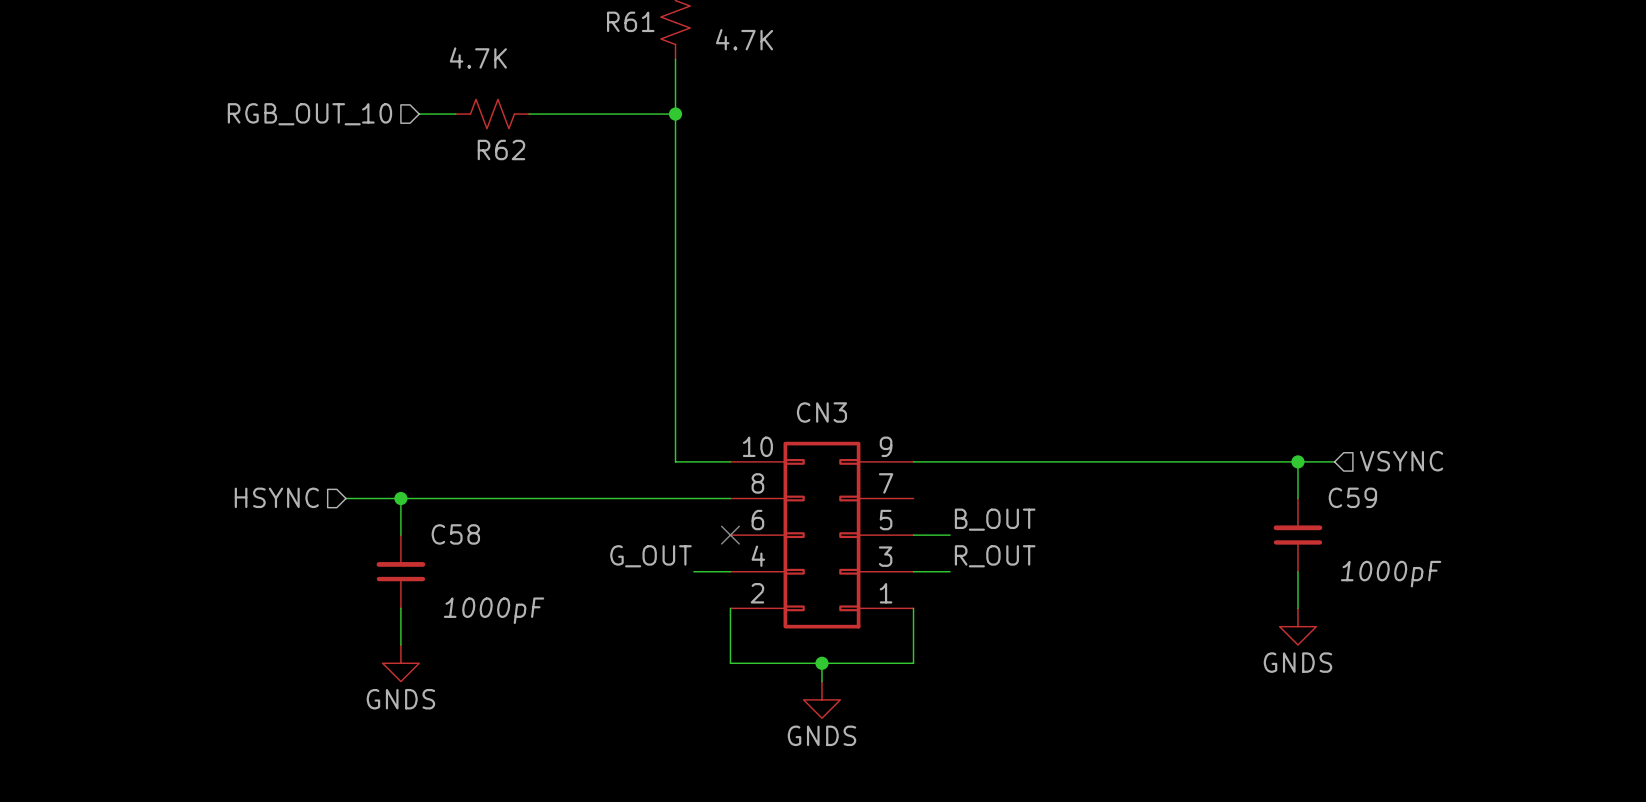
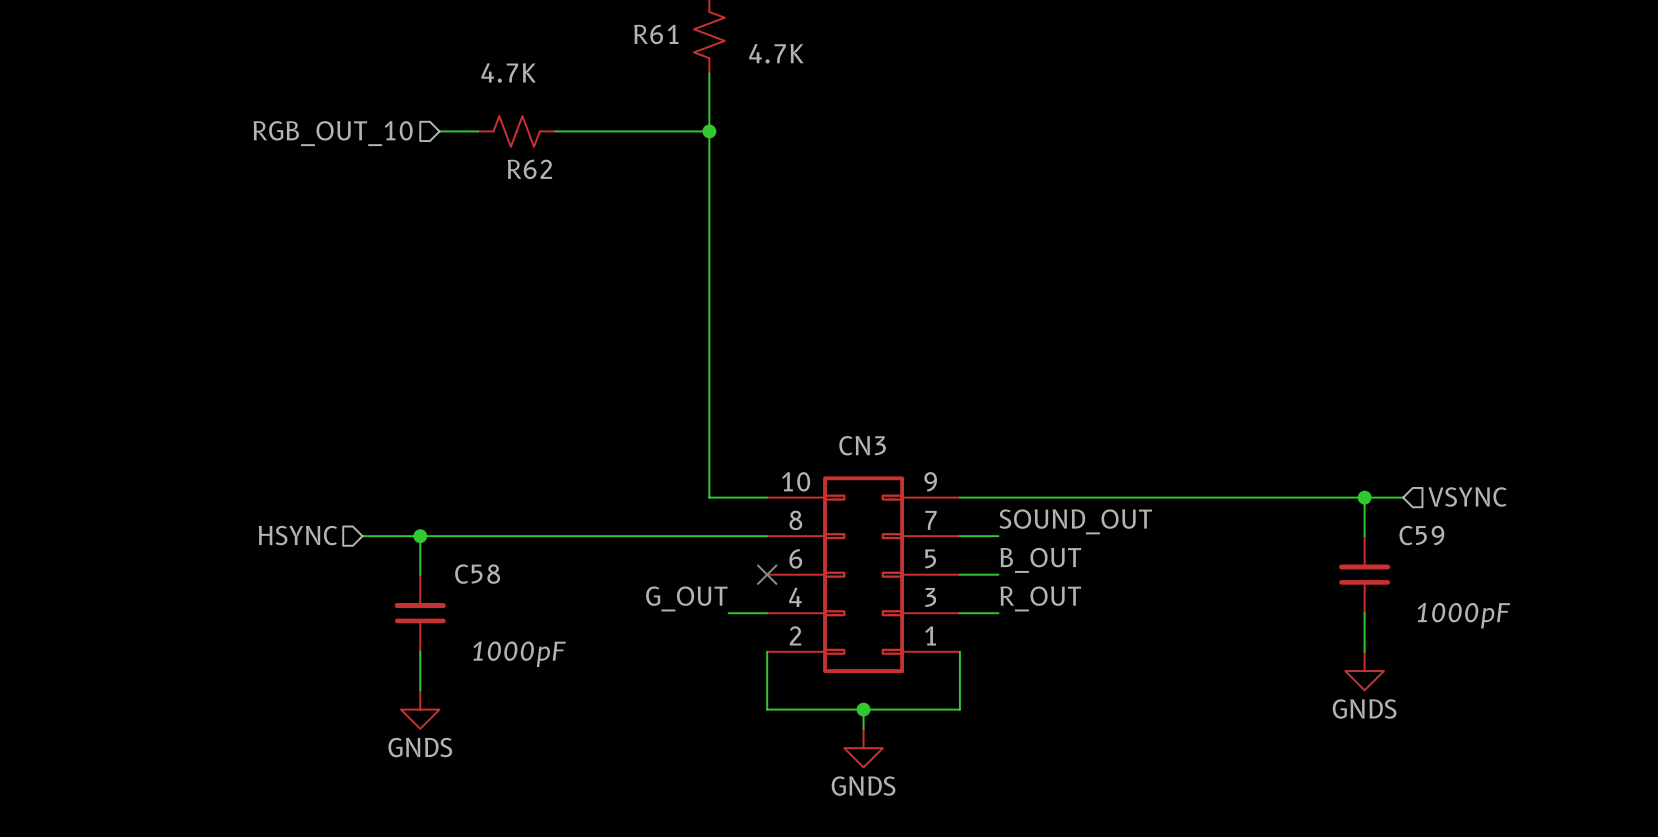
label: none -> SOUND_OUT (1075, 521)
wire: none -> (959, 536) (998, 536)

